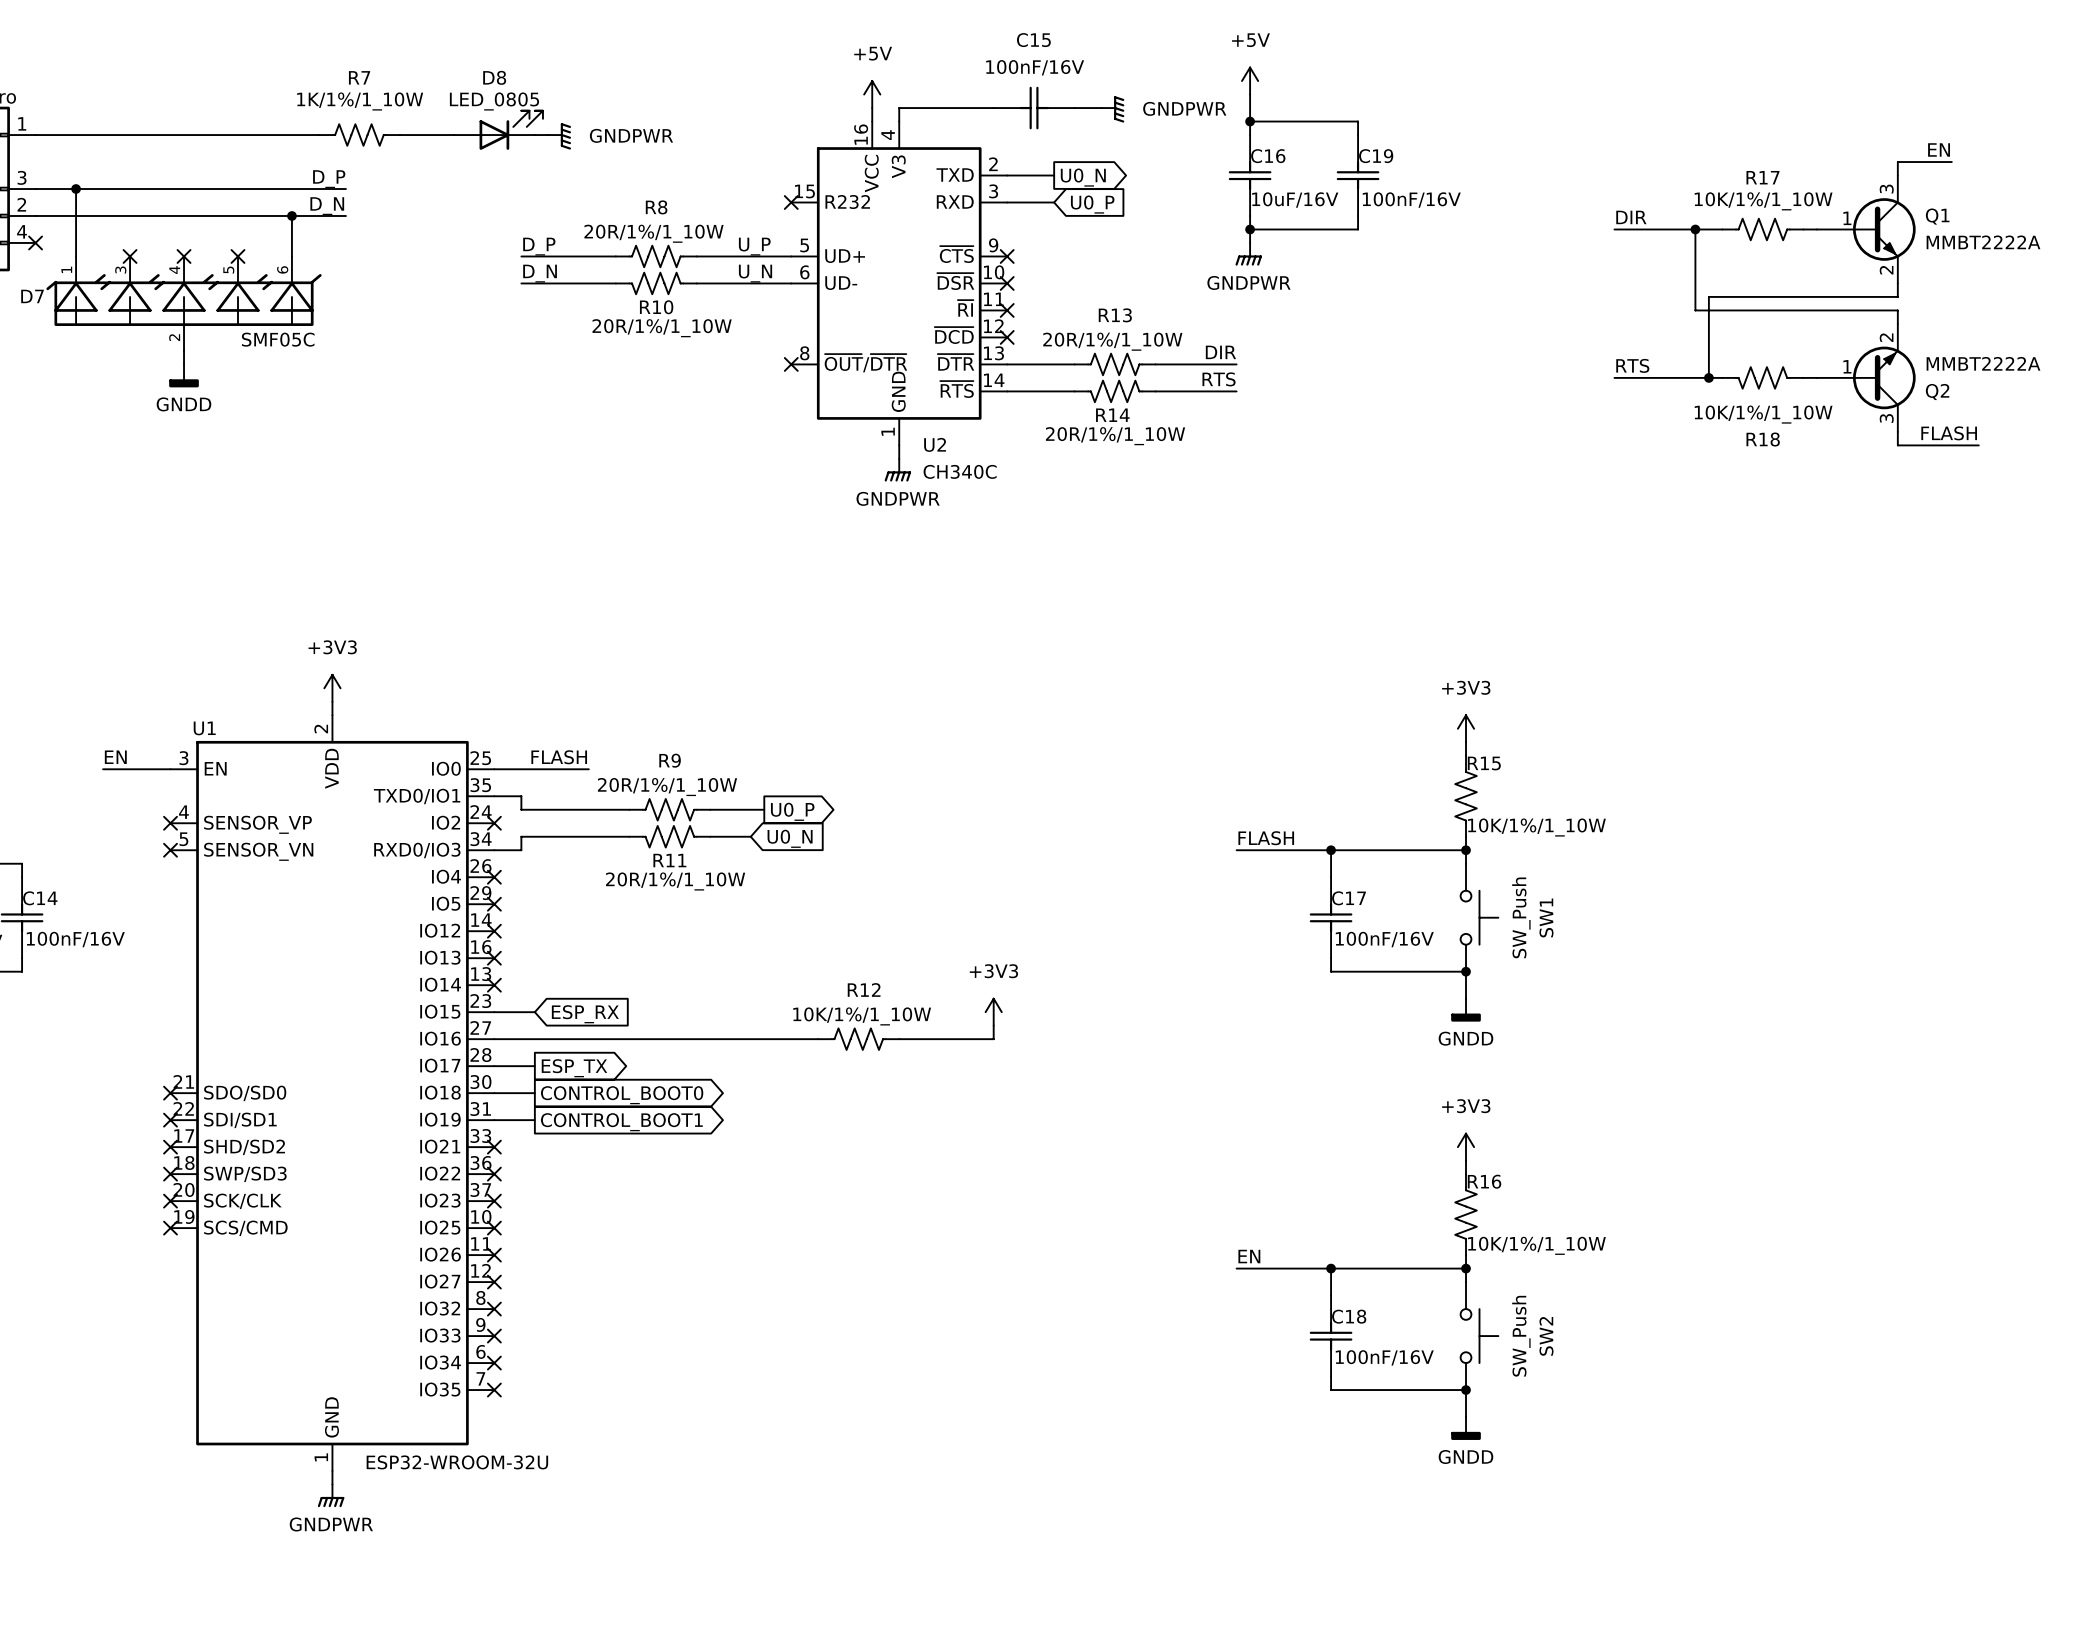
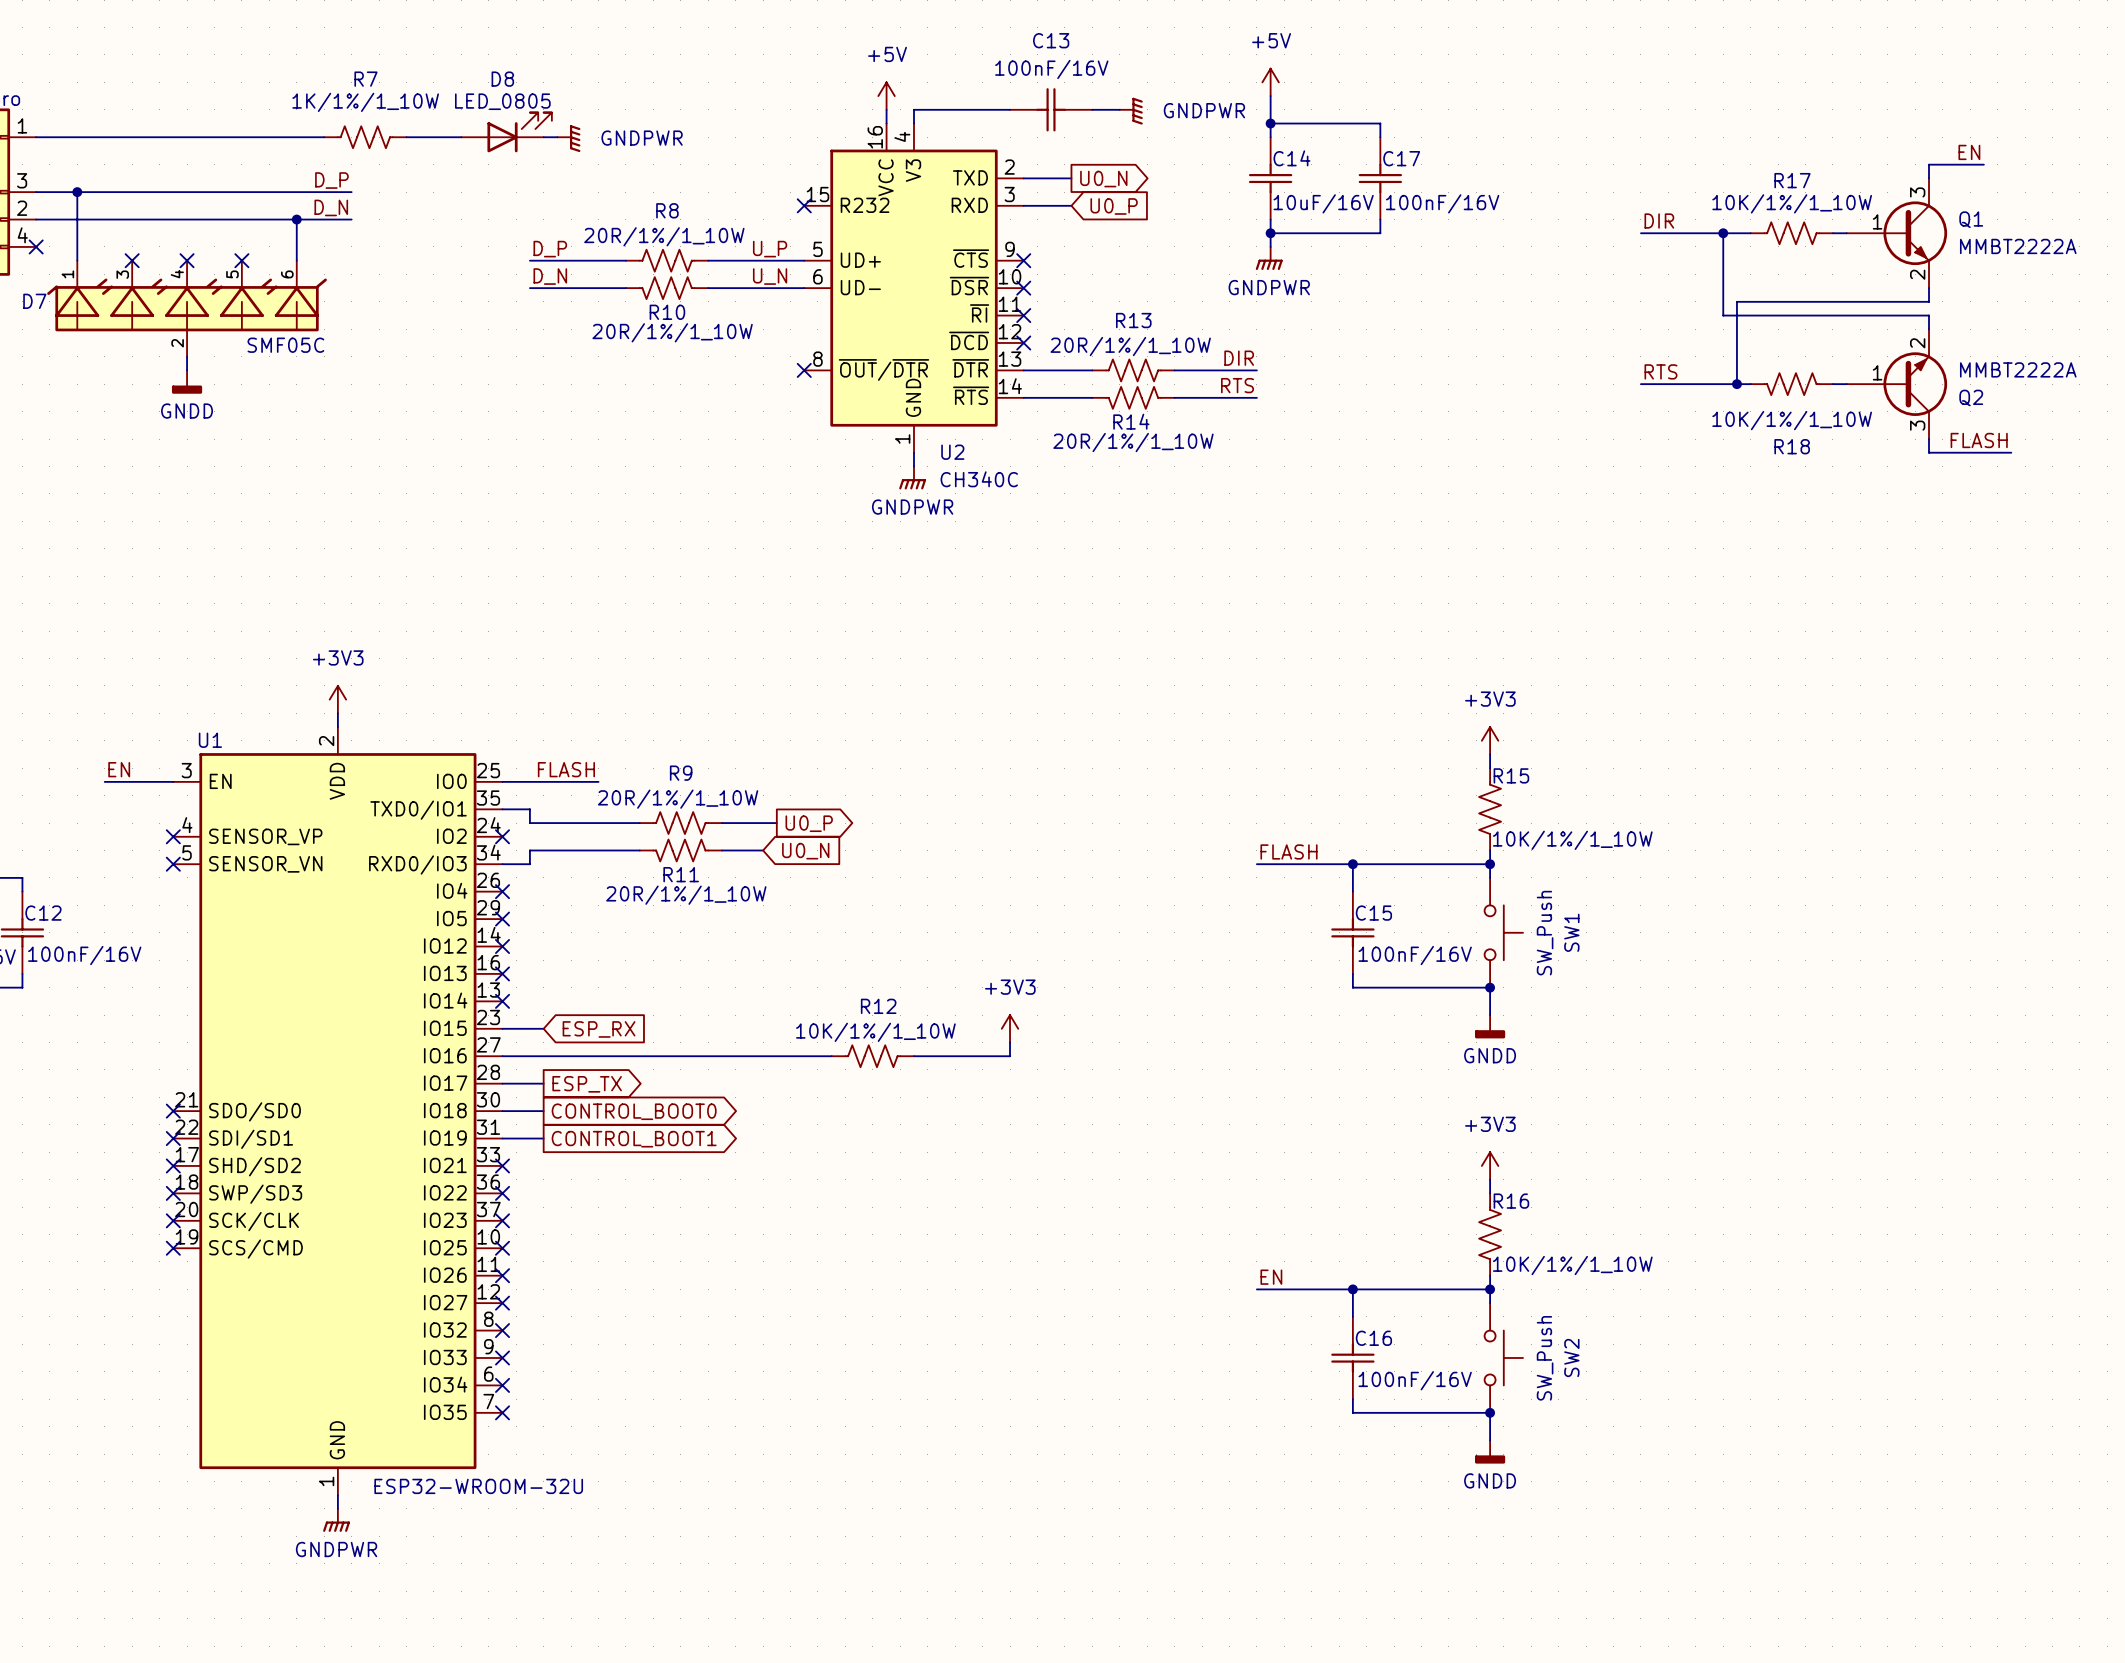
C15 name: C15 (1033, 40) -> C13 (1051, 40)
C16 name: C16 (1268, 156) -> C14 (1291, 158)
C19 name: C19 (1376, 156) -> C17 (1401, 158)
C14 name: C14 (40, 898) -> C12 (43, 913)
C17 name: C17 (1349, 898) -> C15 (1373, 913)
C18 name: C18 (1349, 1316) -> C16 (1373, 1338)

